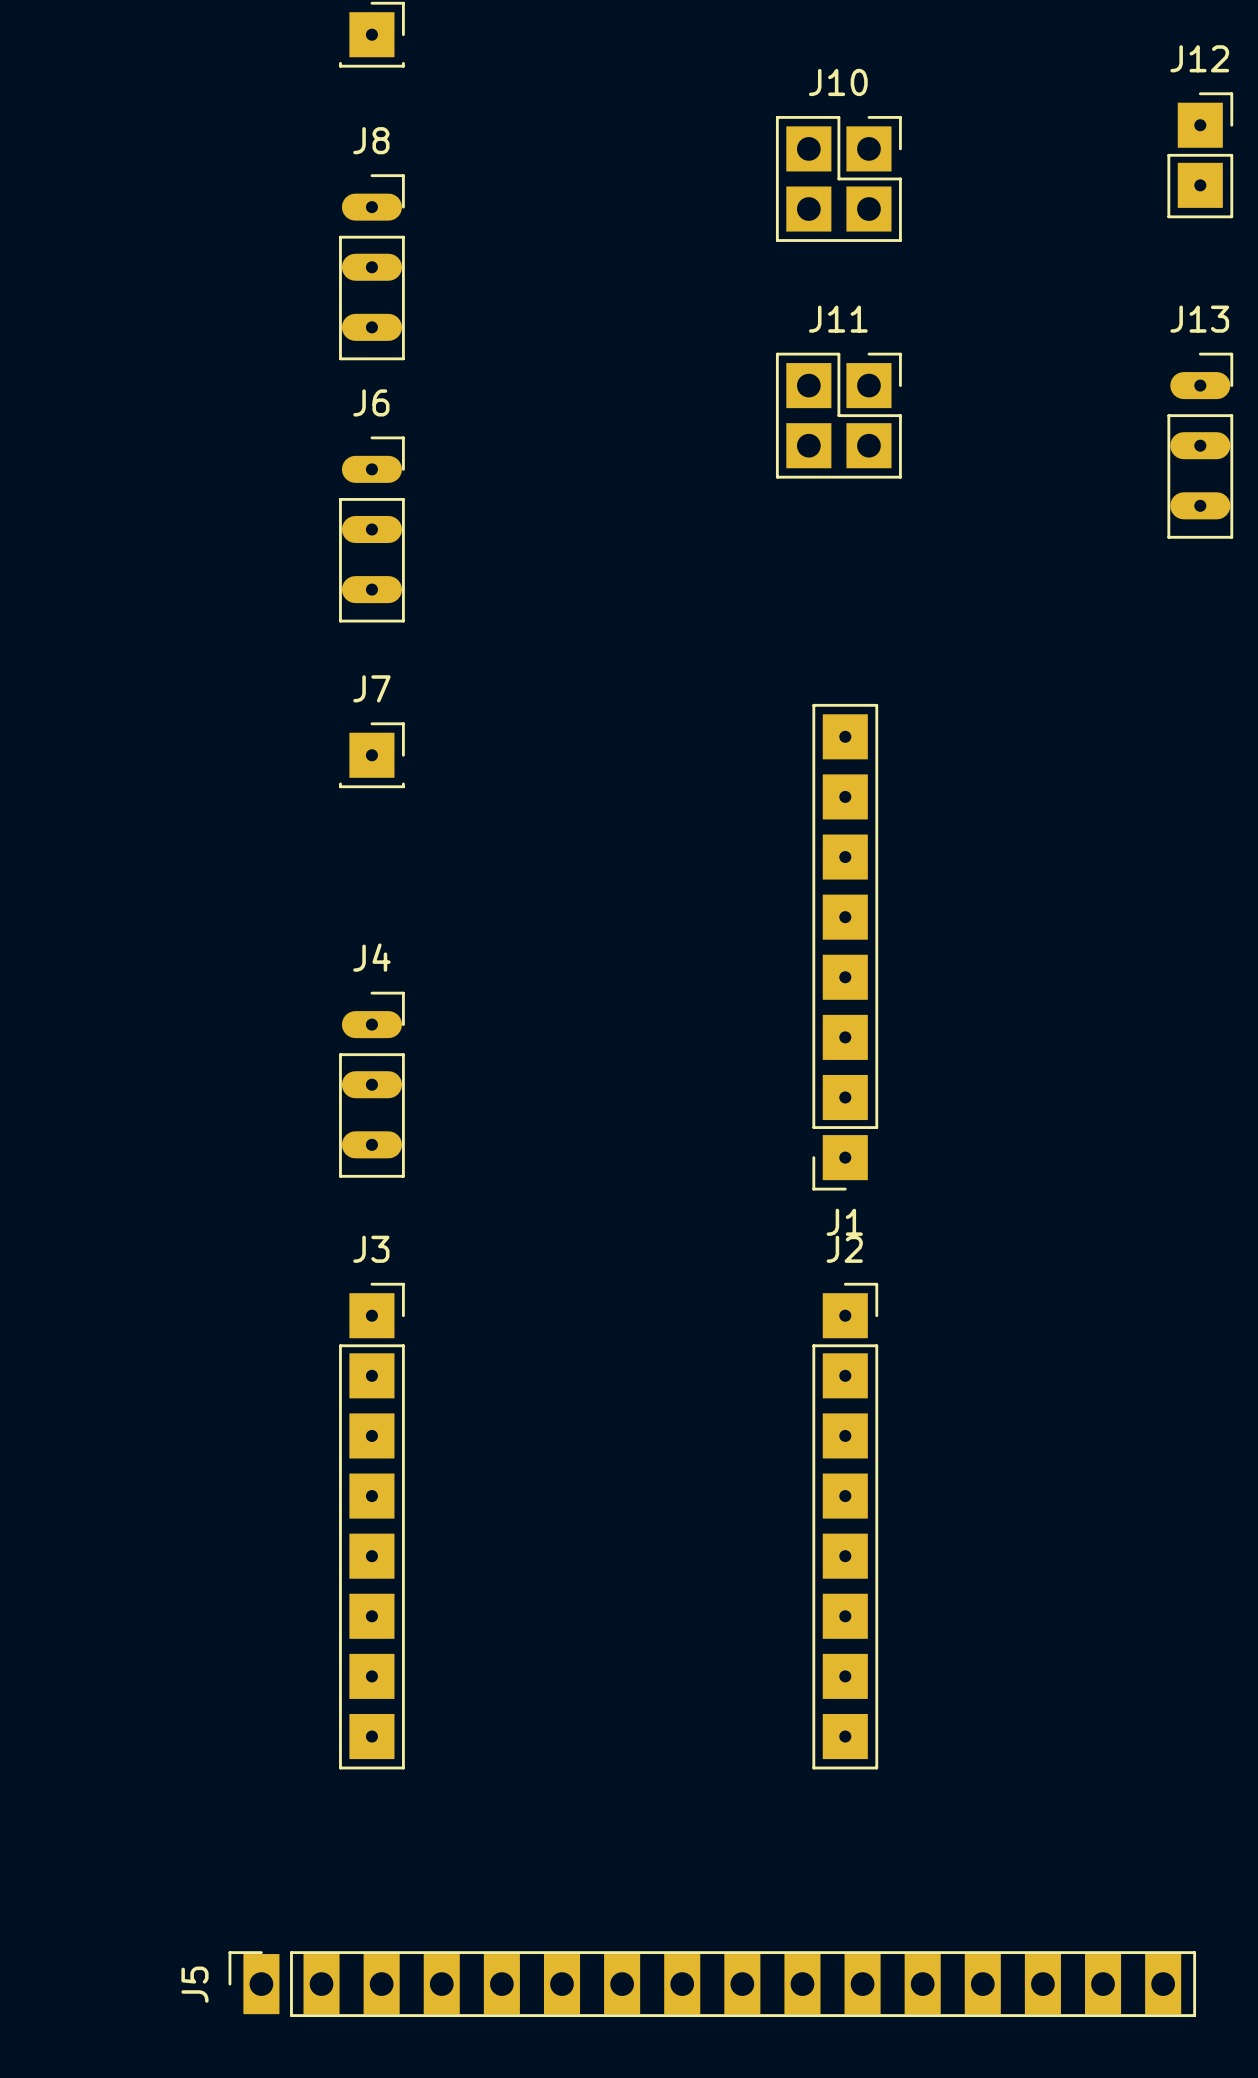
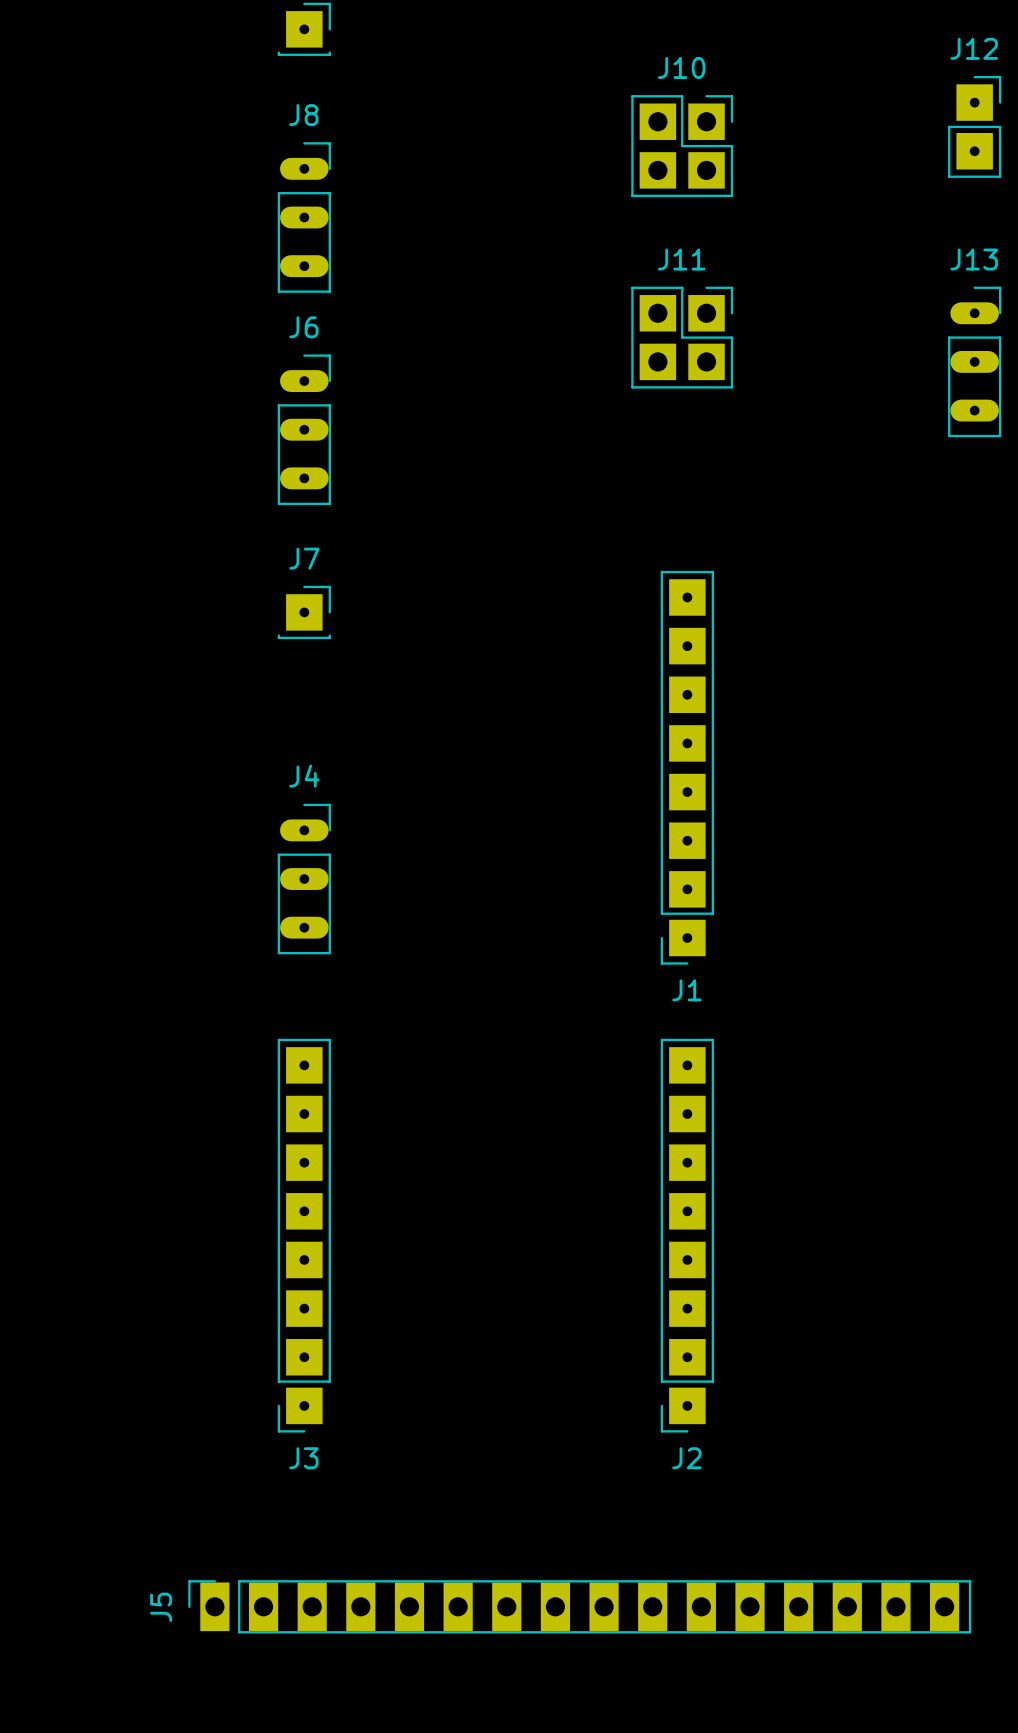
J3 rotation: 0° (371, 1526) -> 180° (304, 1235)
J2 rotation: 0° (845, 1526) -> 180° (687, 1235)

